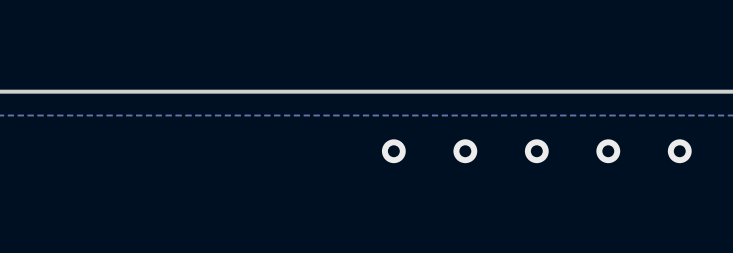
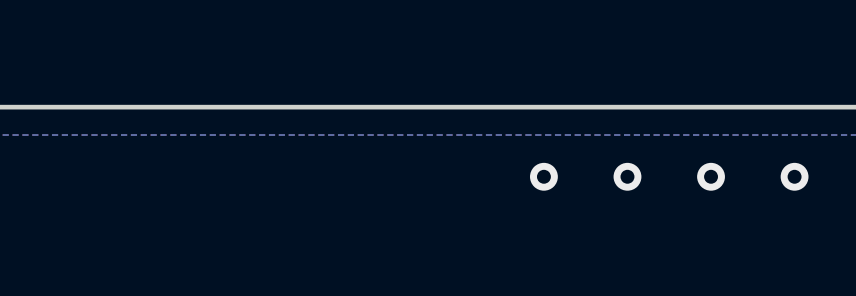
via: (393, 151) -> none

